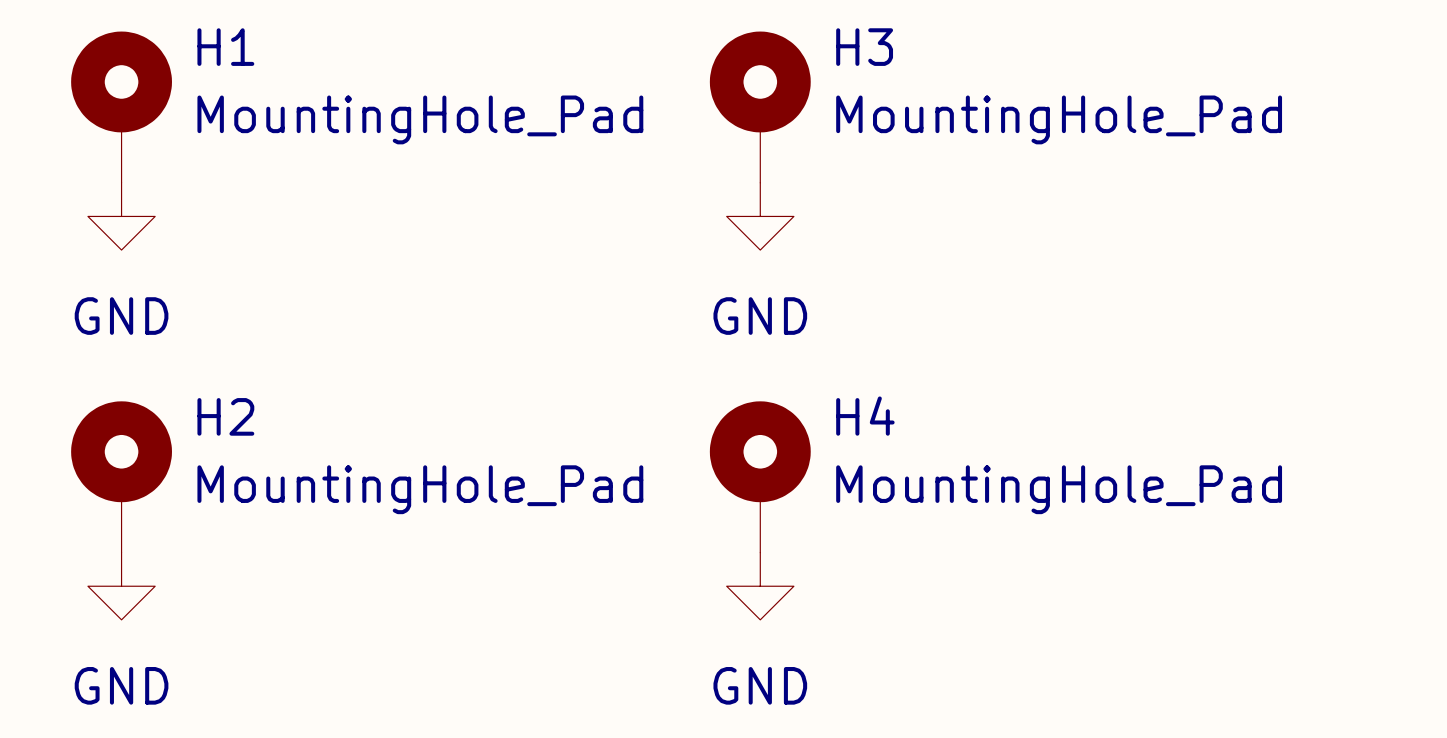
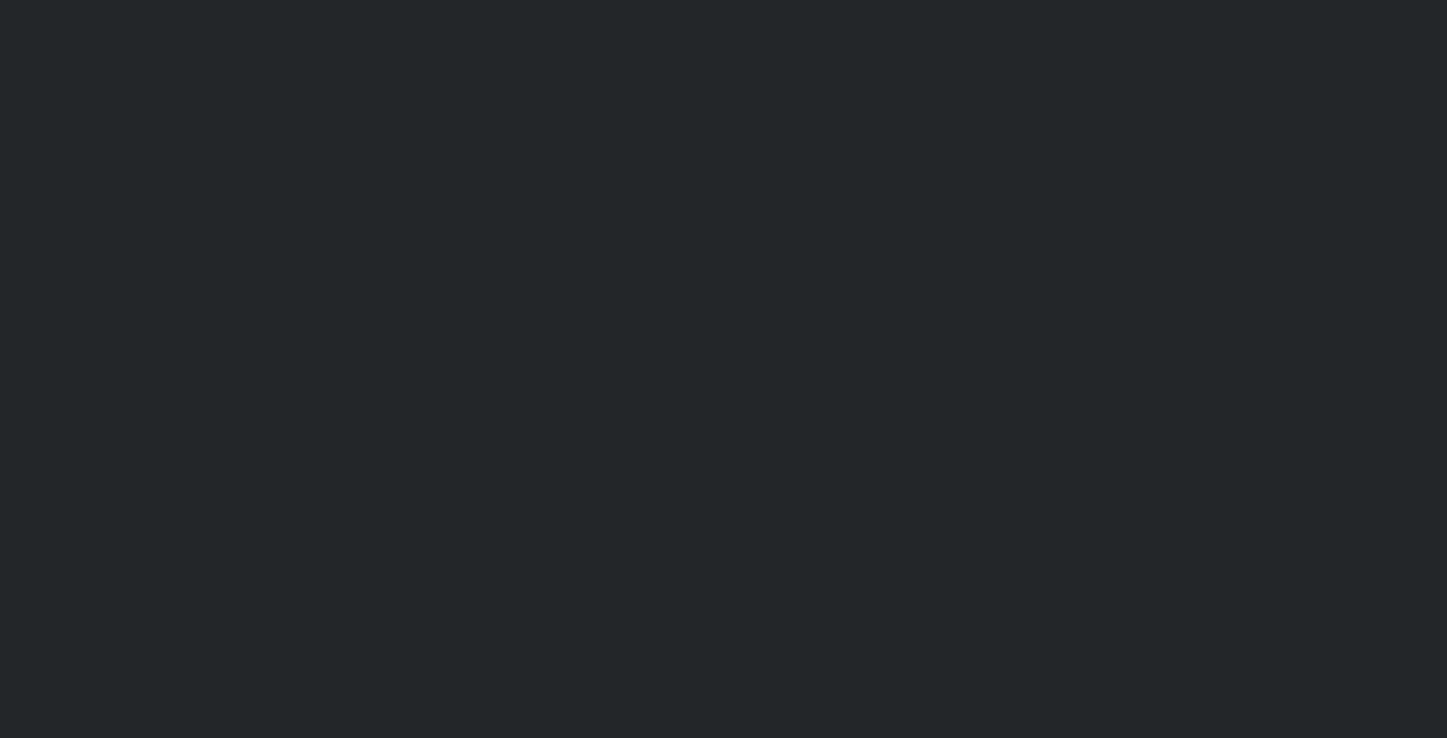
H1: MountingHole_Pad (121, 107) -> none
H3: MountingHole_Pad (760, 107) -> none
power symbol: GND (121, 216) -> none
power symbol: GND (760, 216) -> none
H2: MountingHole_Pad (121, 476) -> none
H4: MountingHole_Pad (760, 476) -> none
power symbol: GND (121, 586) -> none
power symbol: GND (760, 586) -> none

